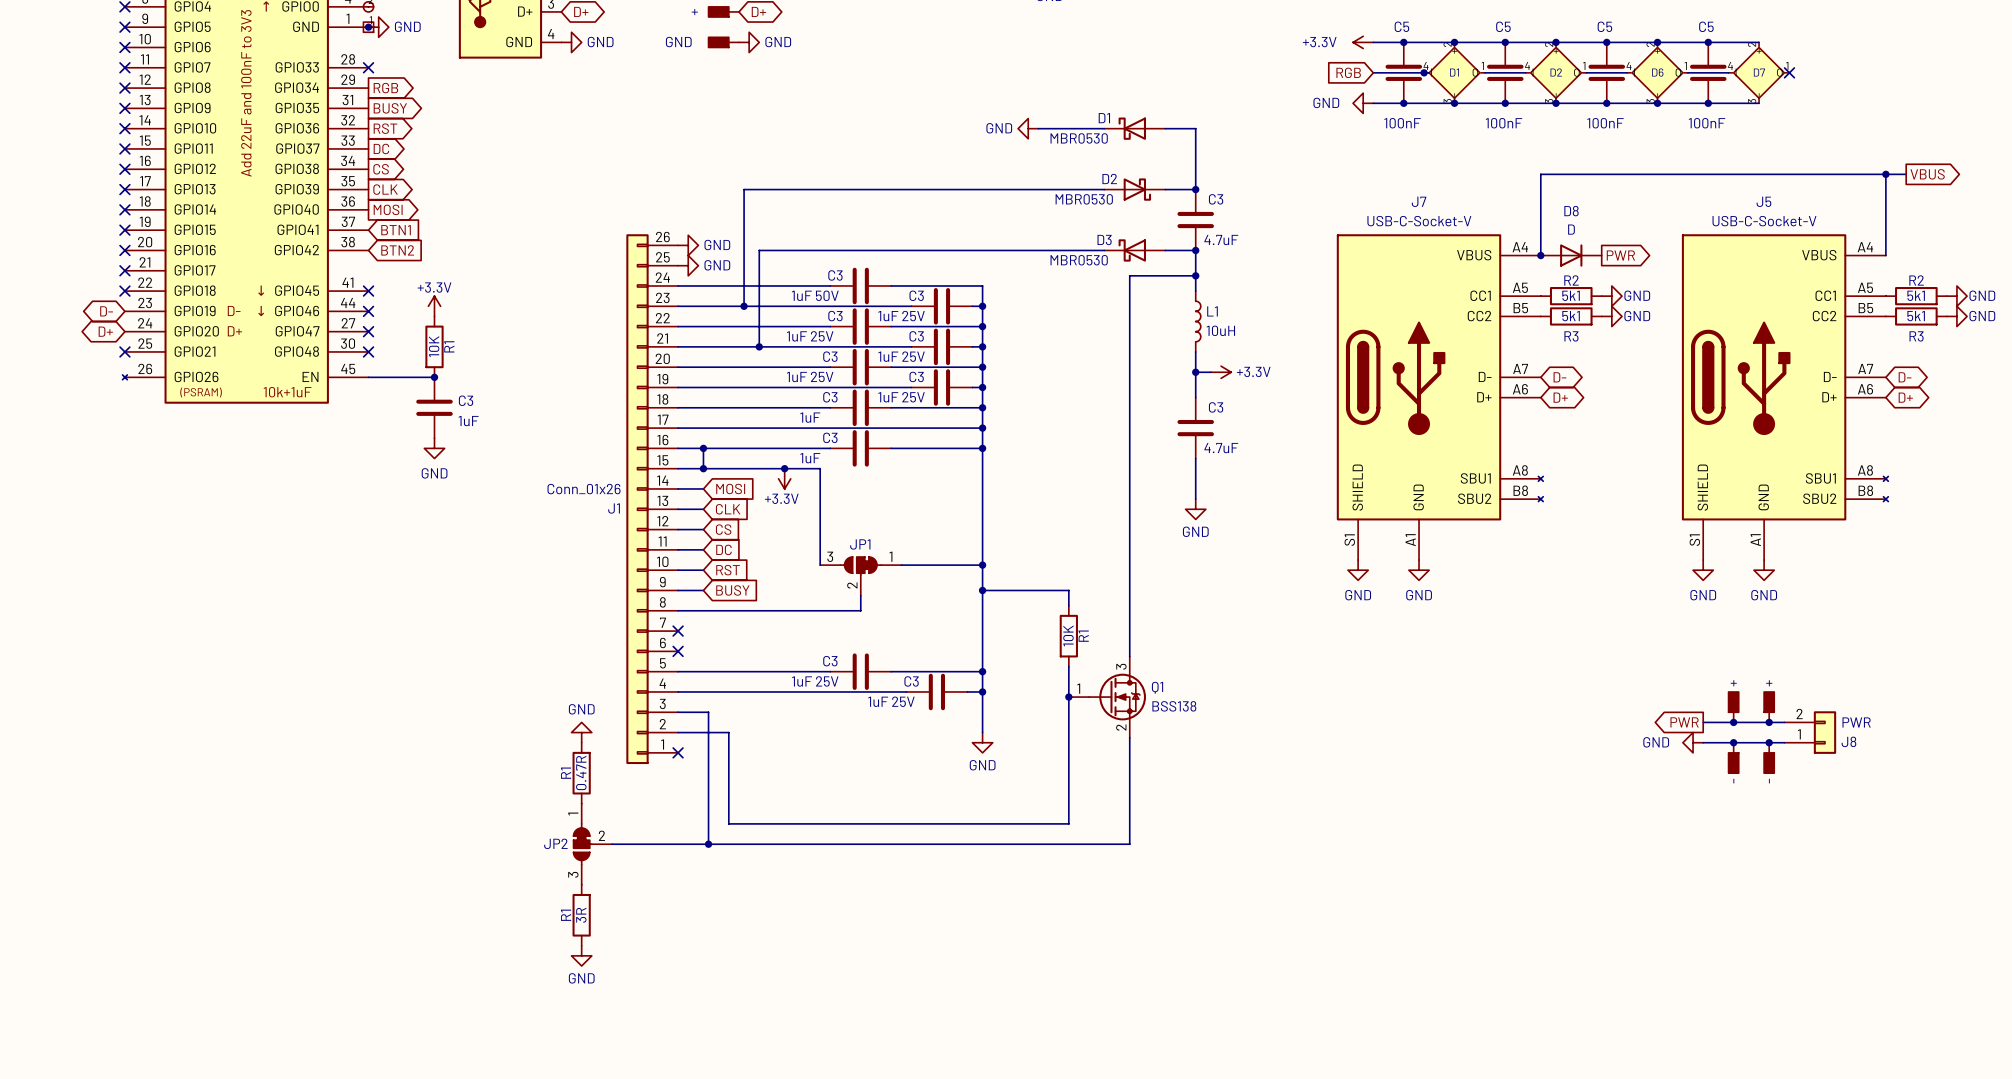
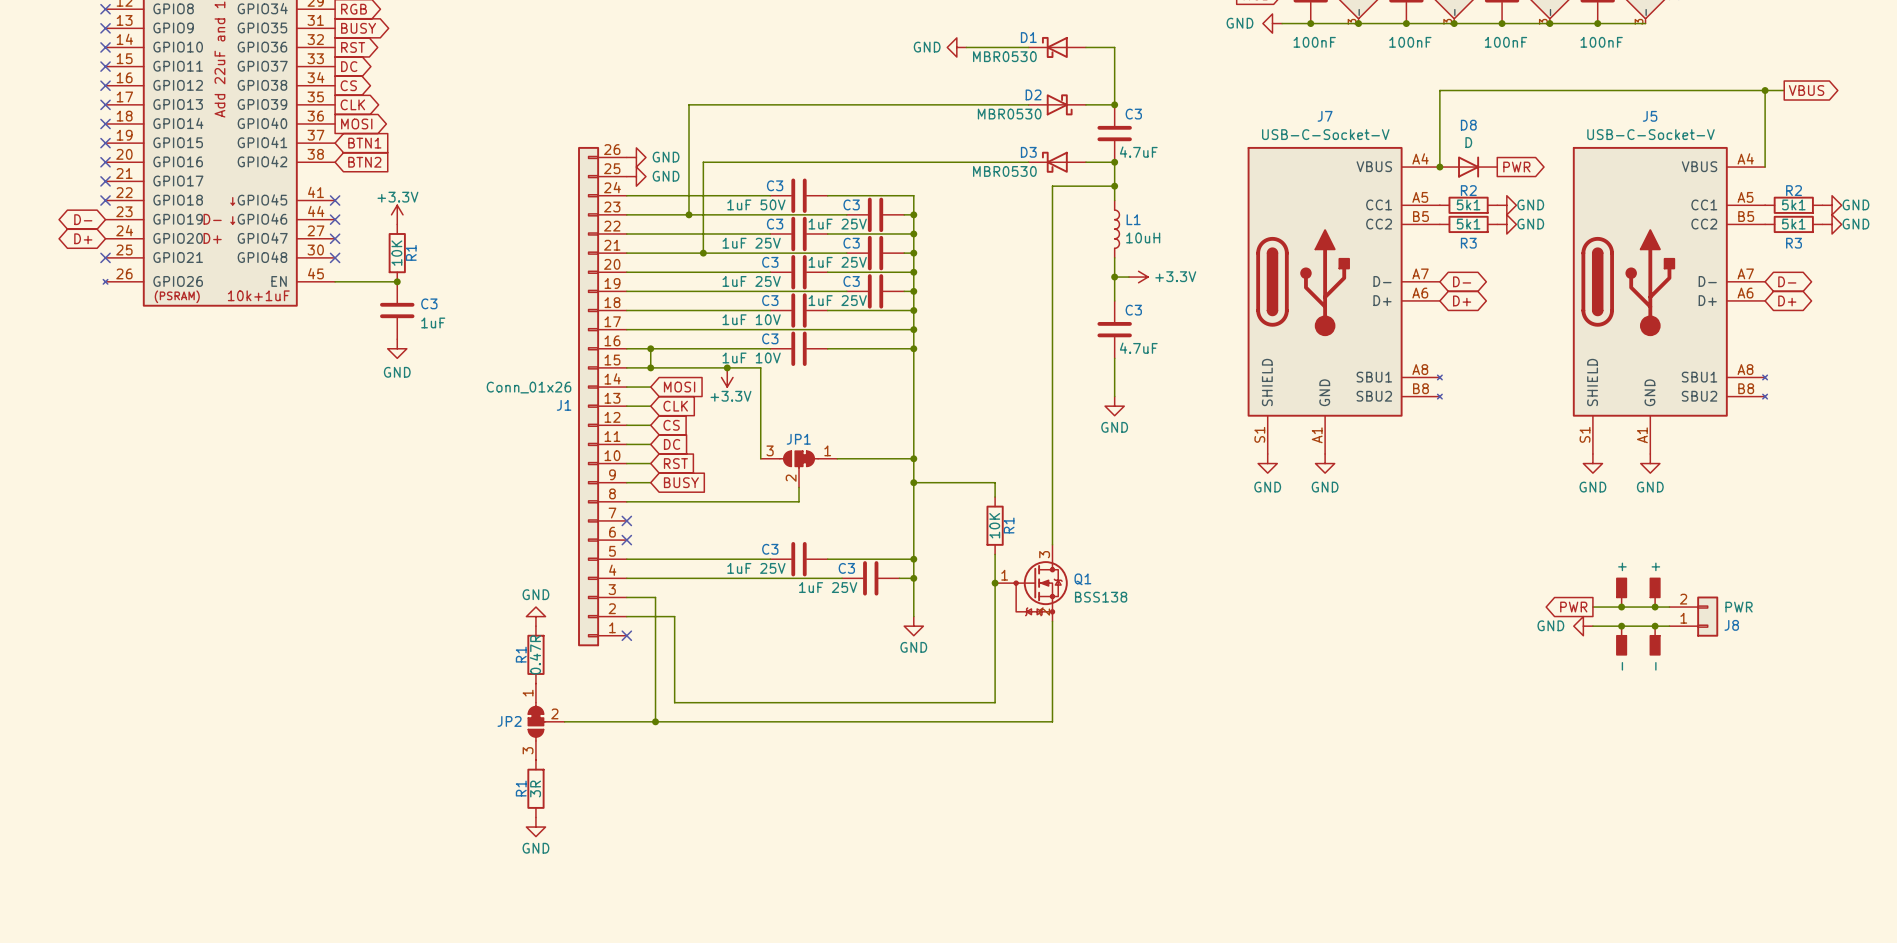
C3 value: 1uF (810, 417) -> 1uF 10V (751, 319)
C3 value: 1uF (810, 458) -> 1uF 10V (751, 357)
Q1 symbol: [1068, 656, 1146, 738] -> [995, 544, 1068, 622]

